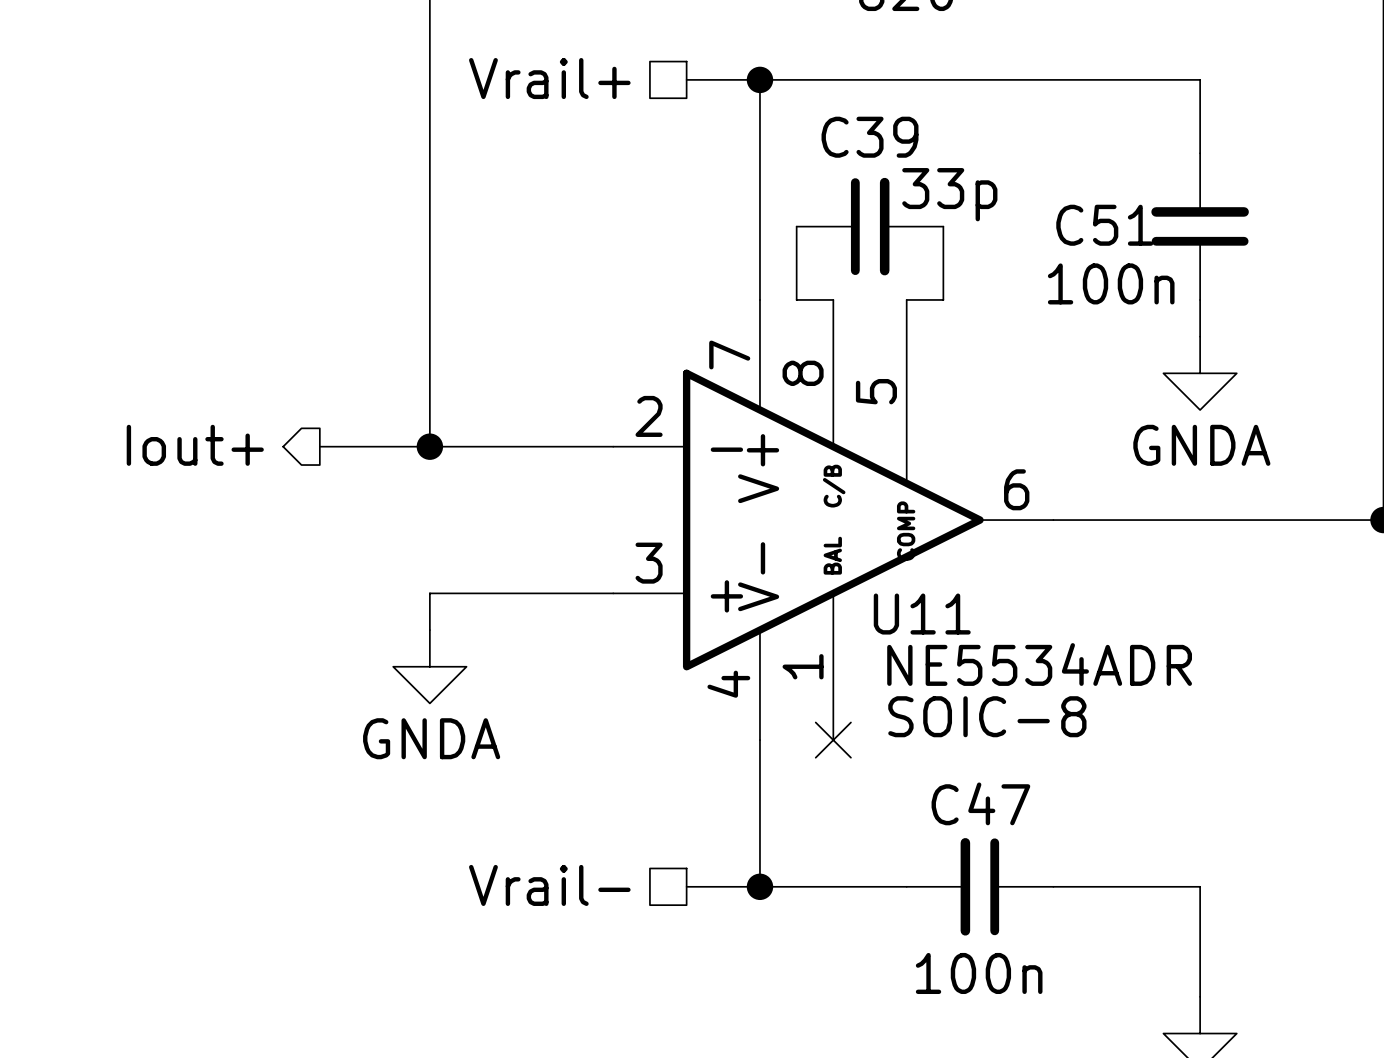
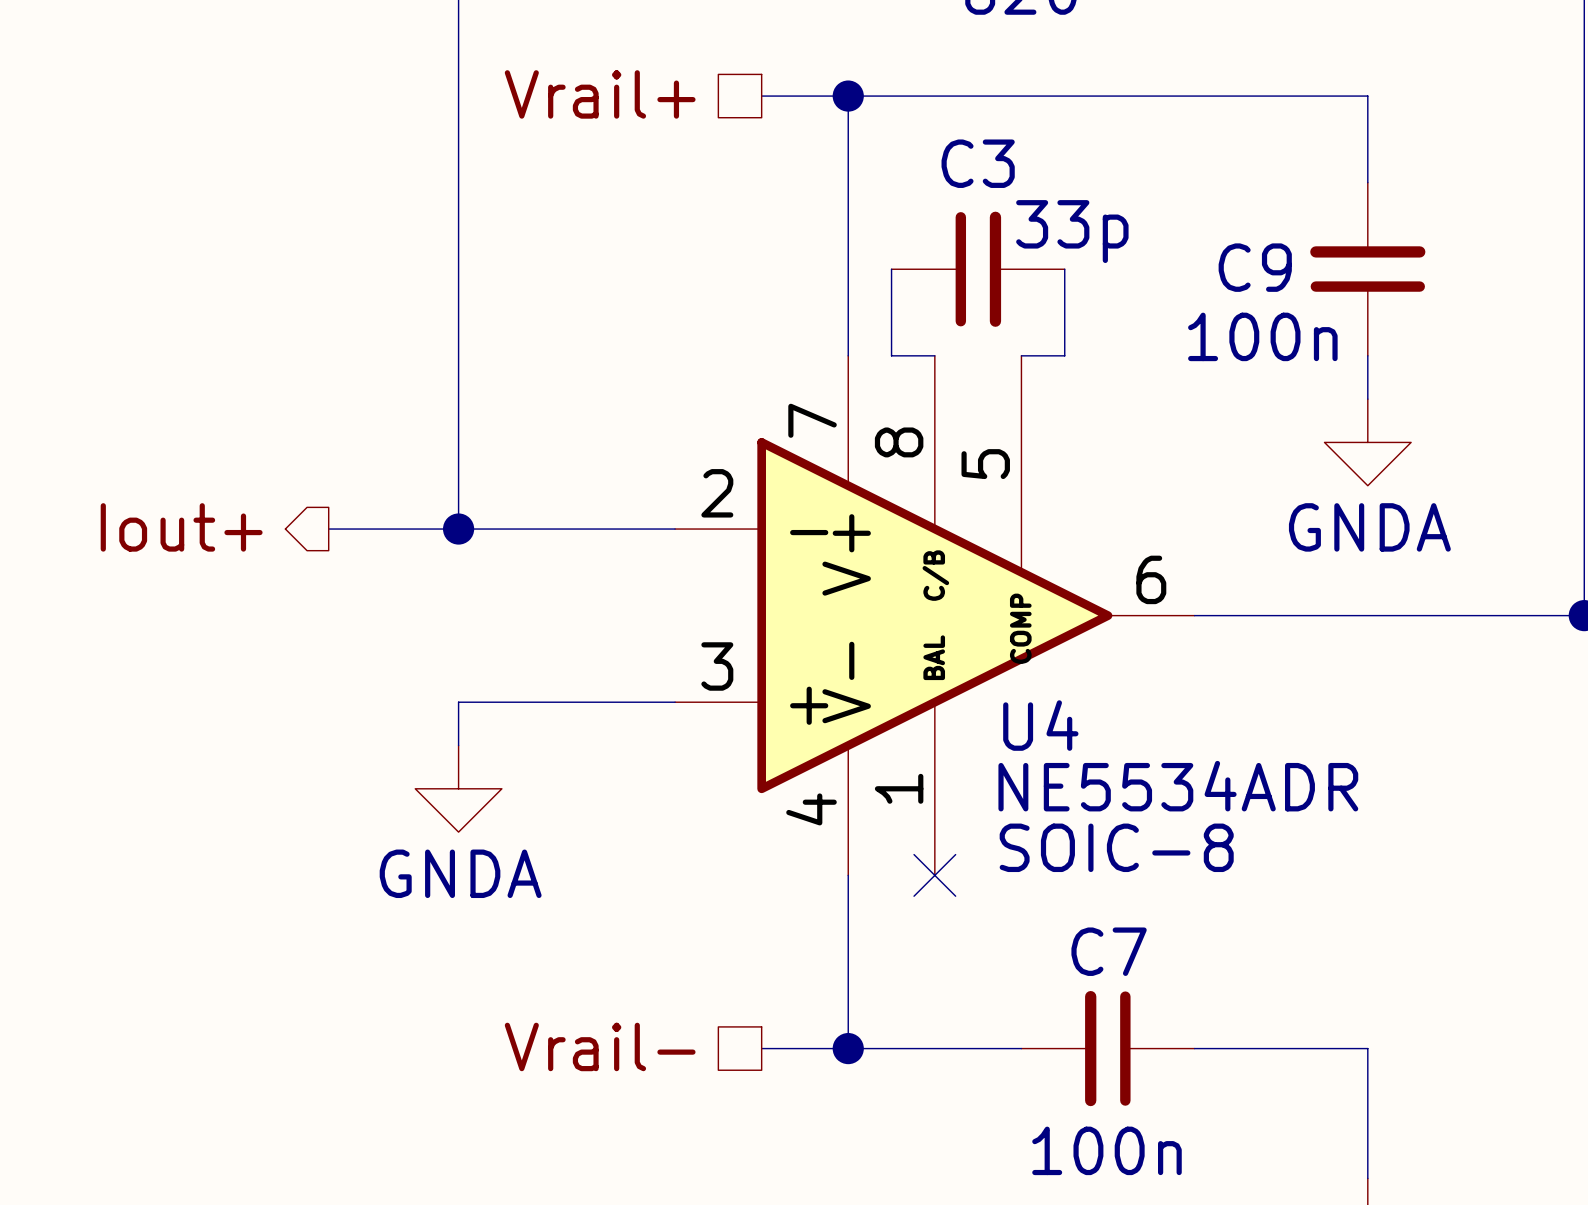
C39 name: C39 (870, 137) -> C3 (978, 163)
C51 name: C51 (1104, 225) -> C9 (1255, 267)
U11 name: U11 (922, 614) -> U4 (1040, 725)
C47 name: C47 (980, 803) -> C7 (1109, 951)

